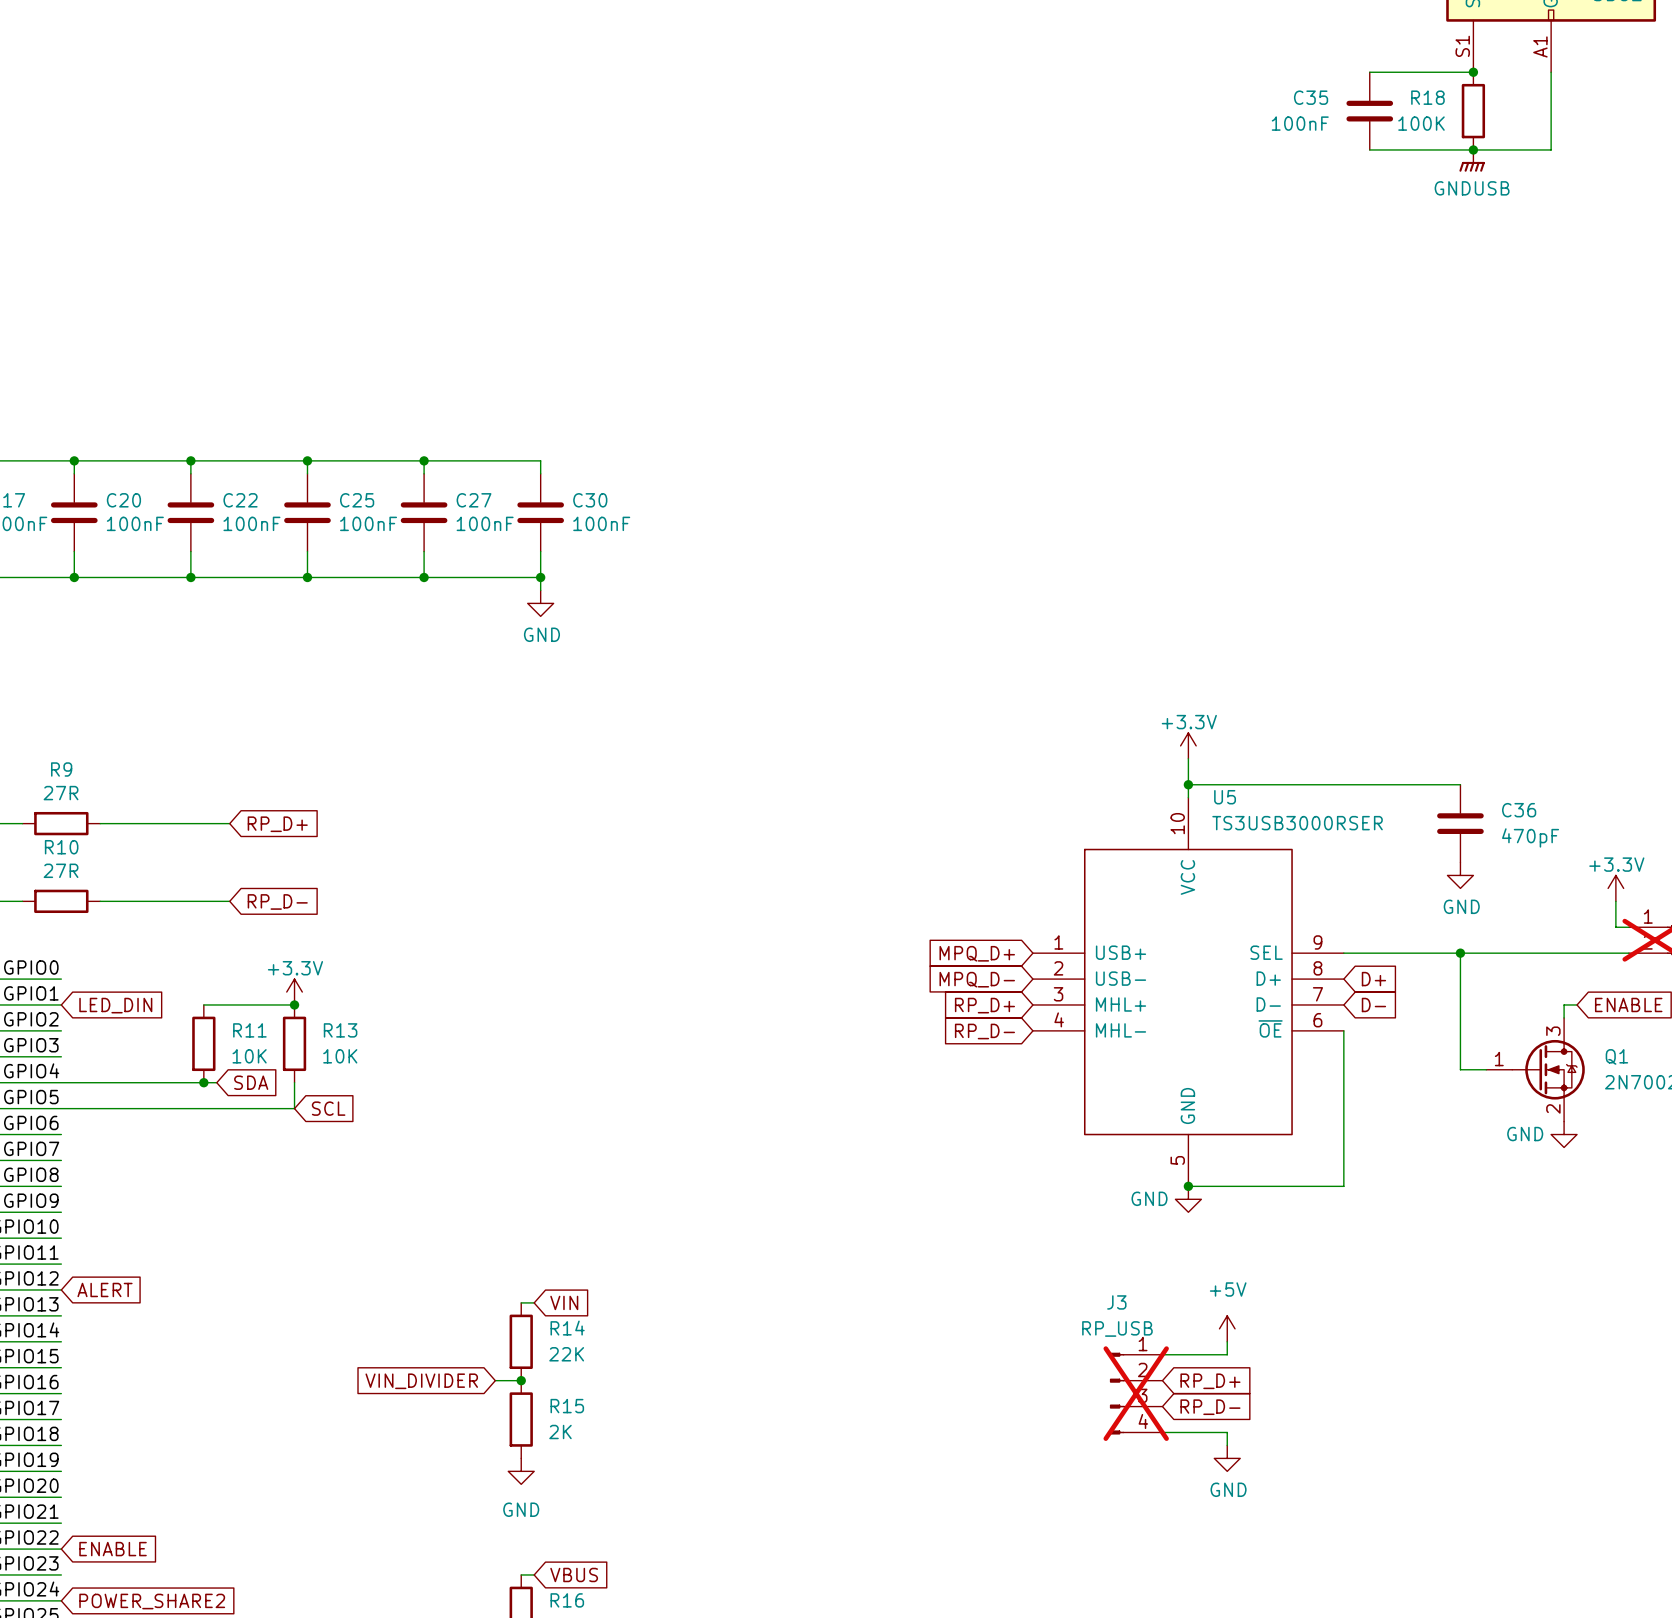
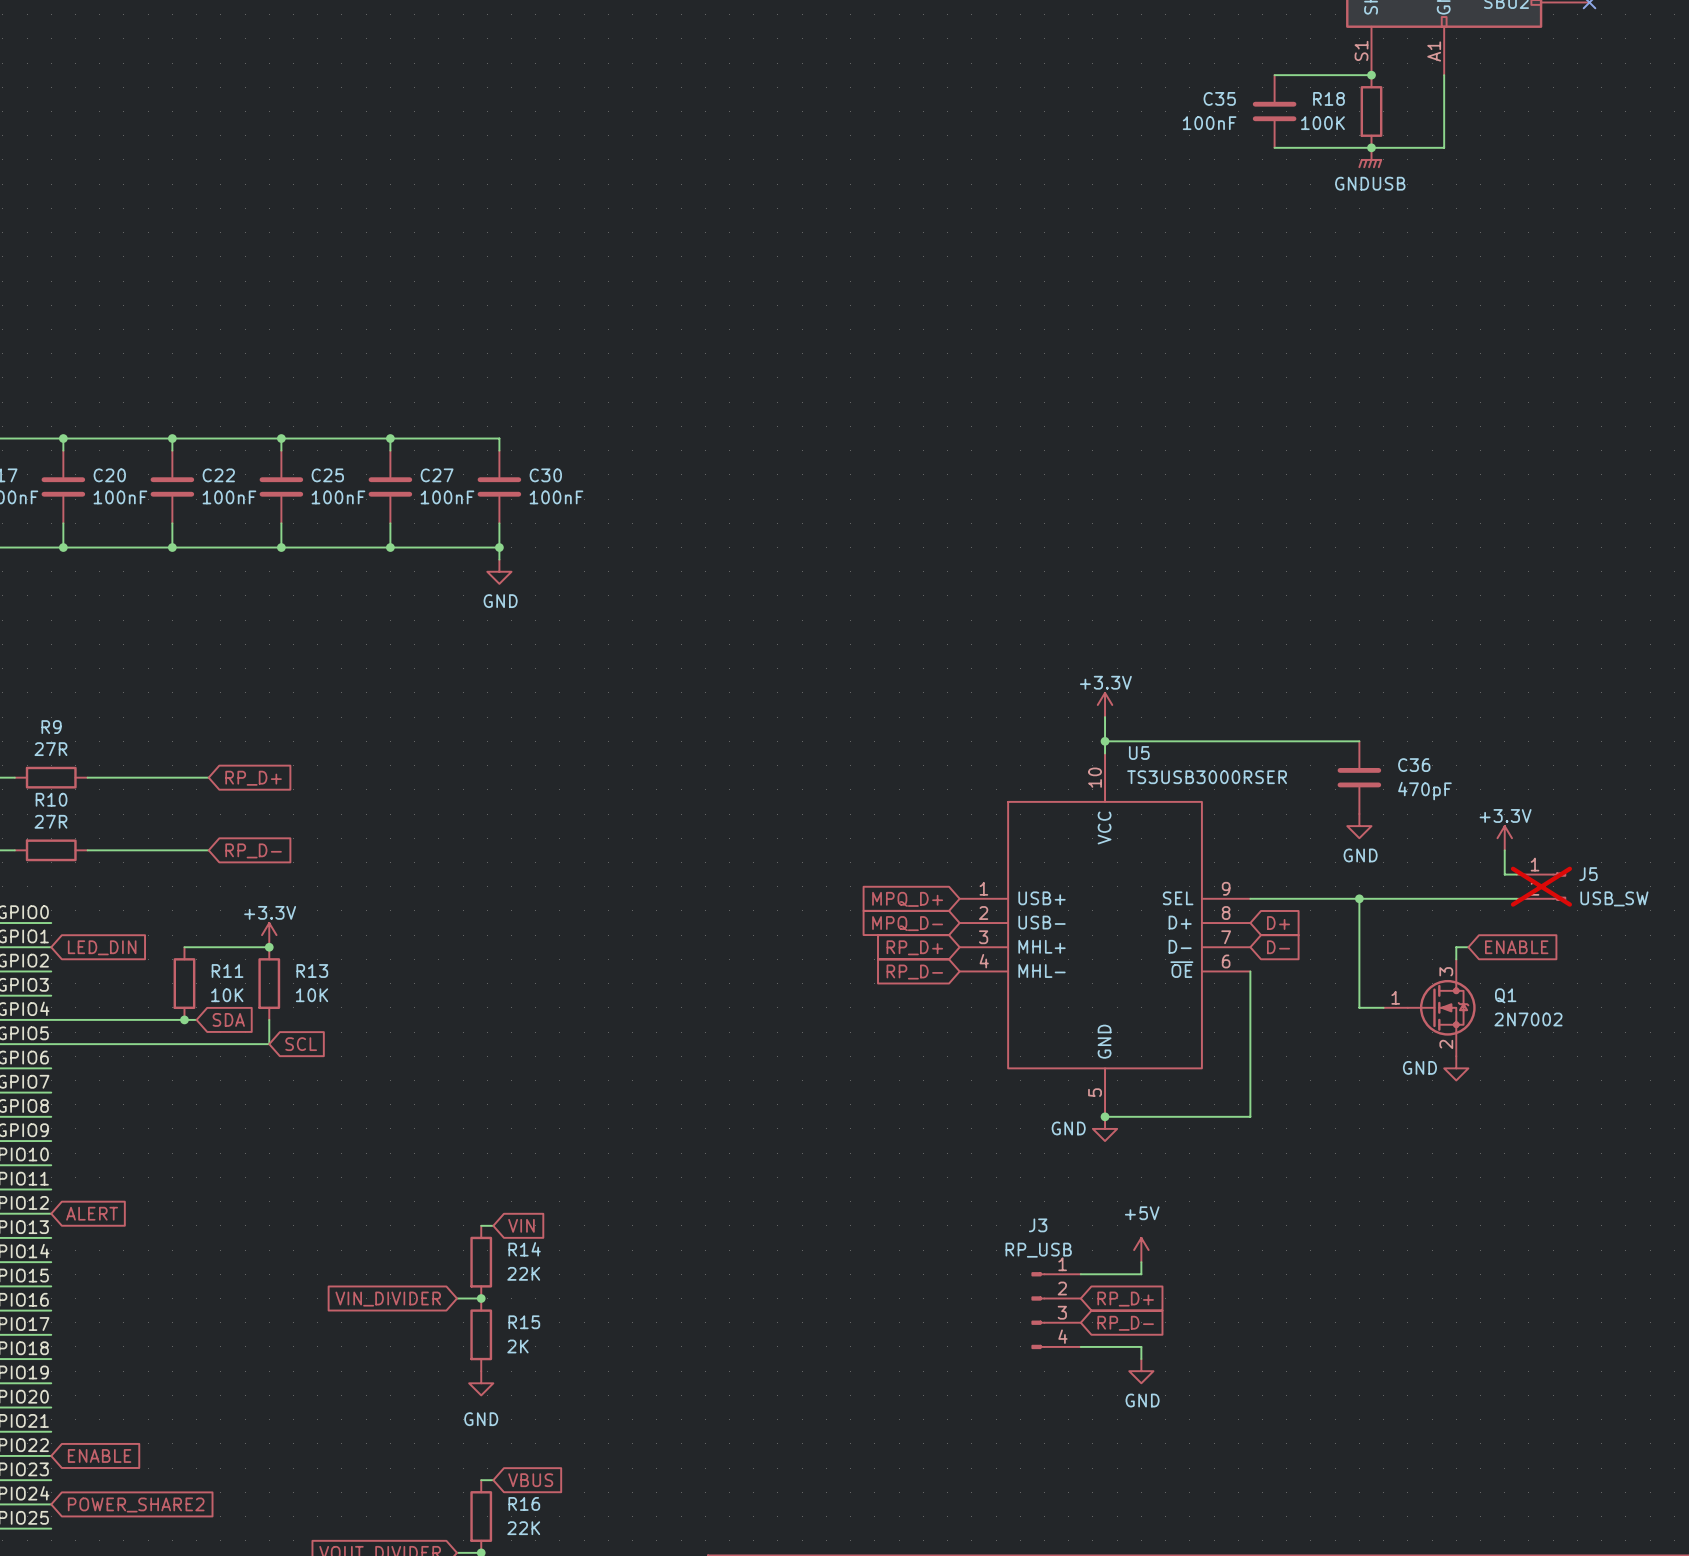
J3 do-not-place cross: (1136, 1393) -> none

